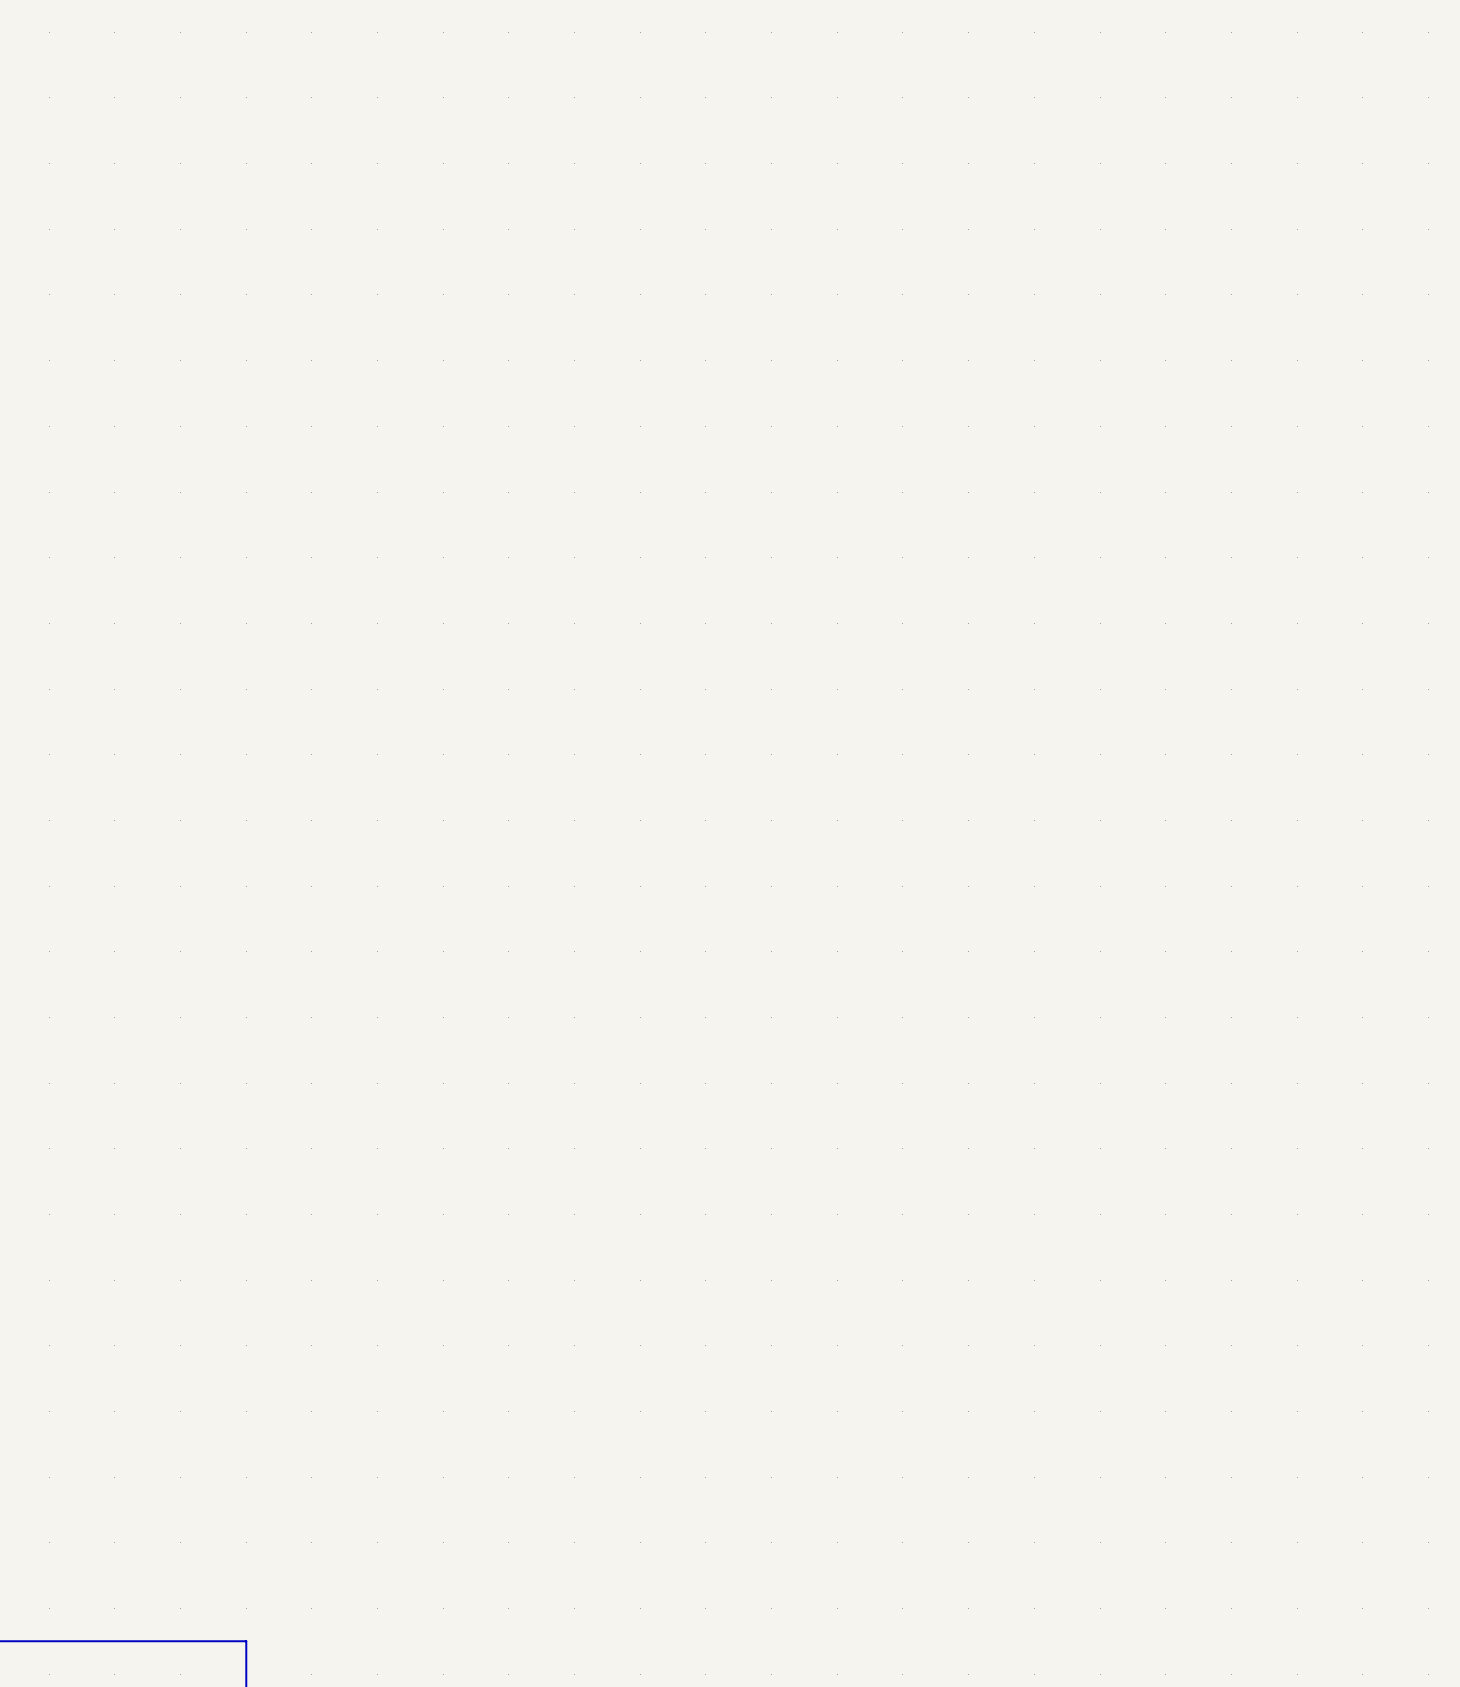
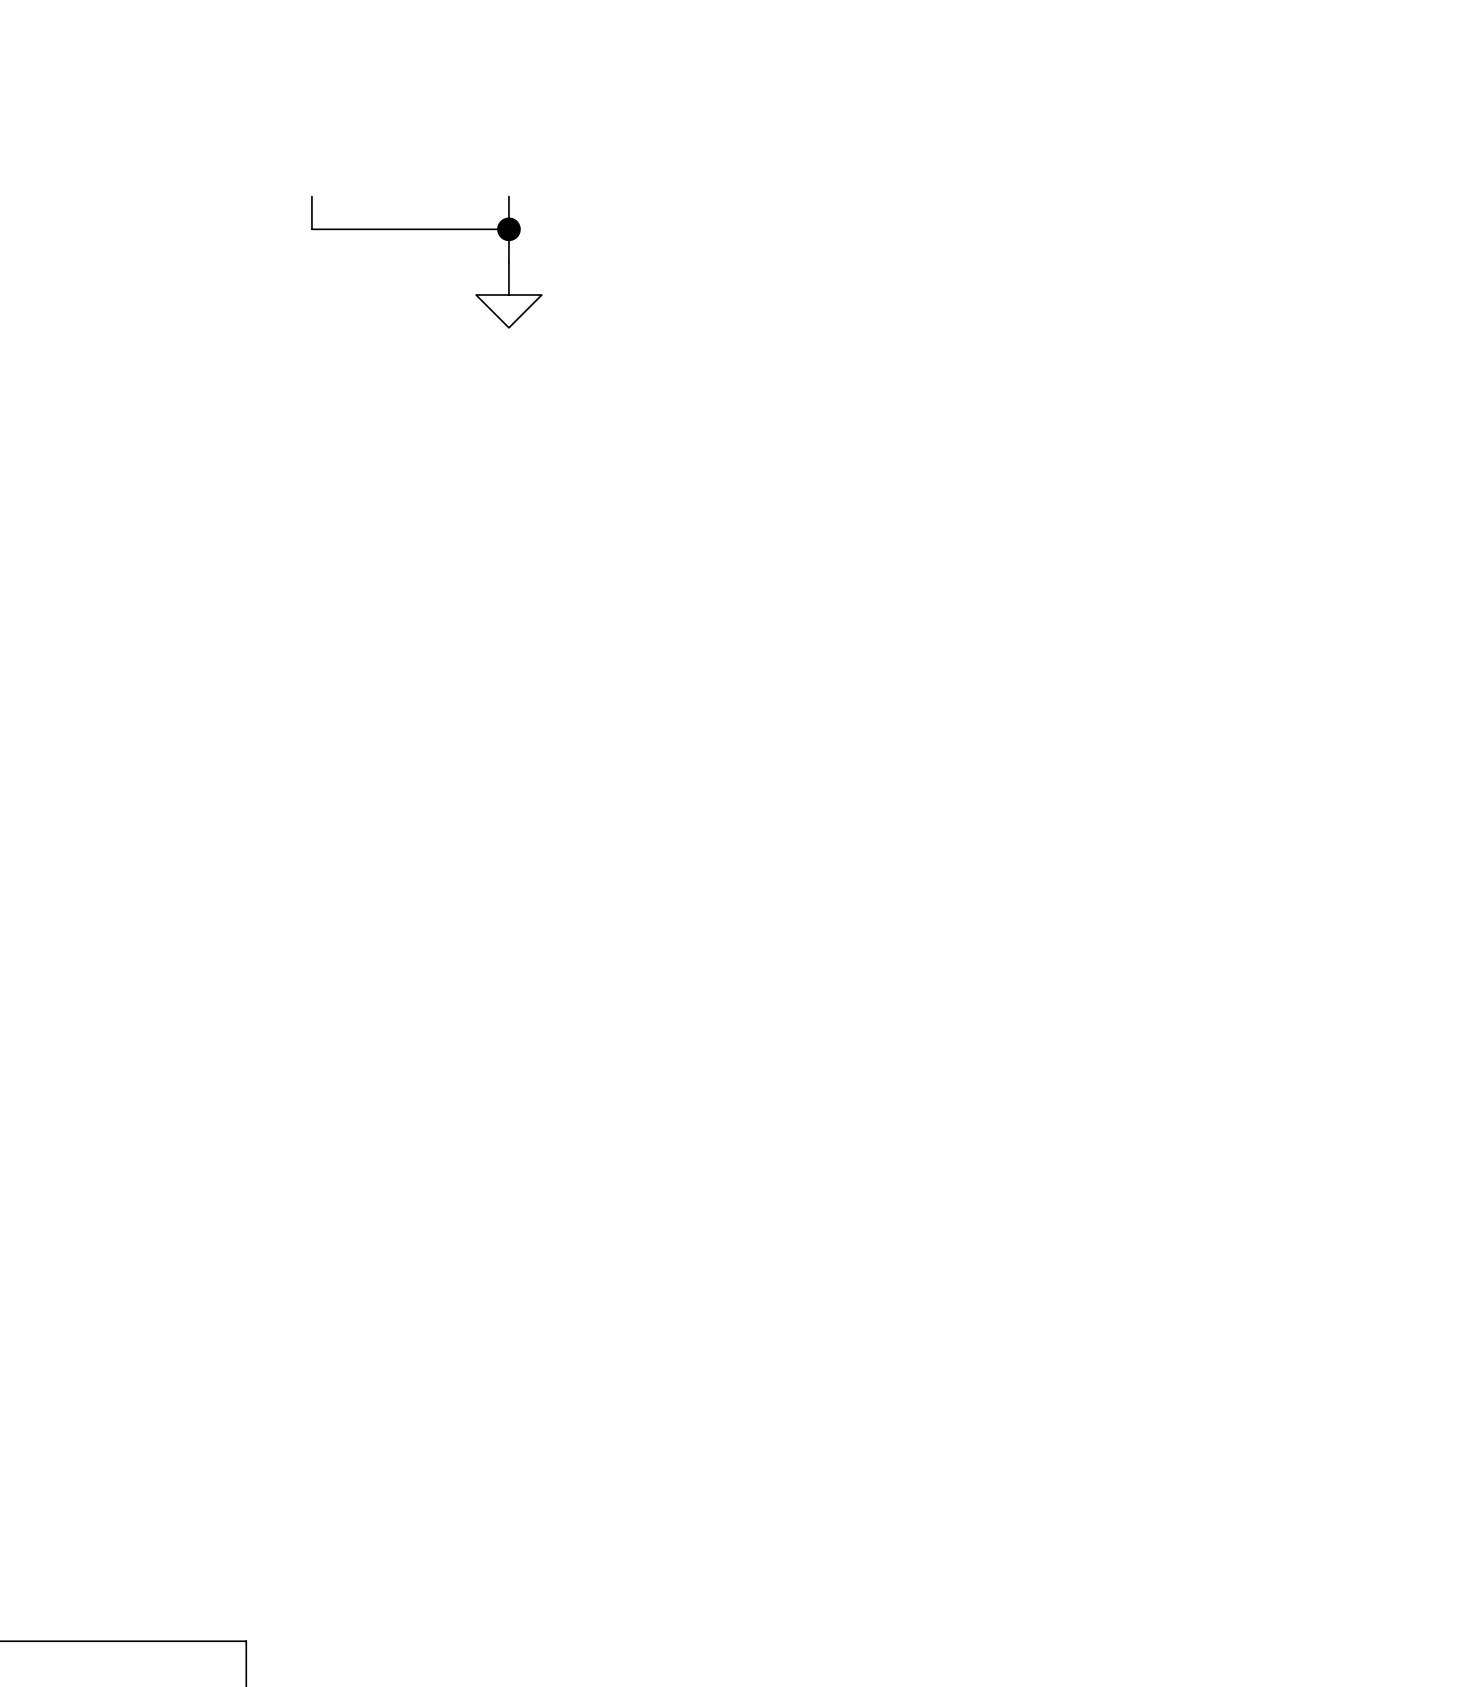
wire: none -> (311, 196) (311, 229) (508, 229)
wire: none -> (508, 196) (508, 262)
junction: none -> (508, 229)
power symbol: none -> (508, 294)

